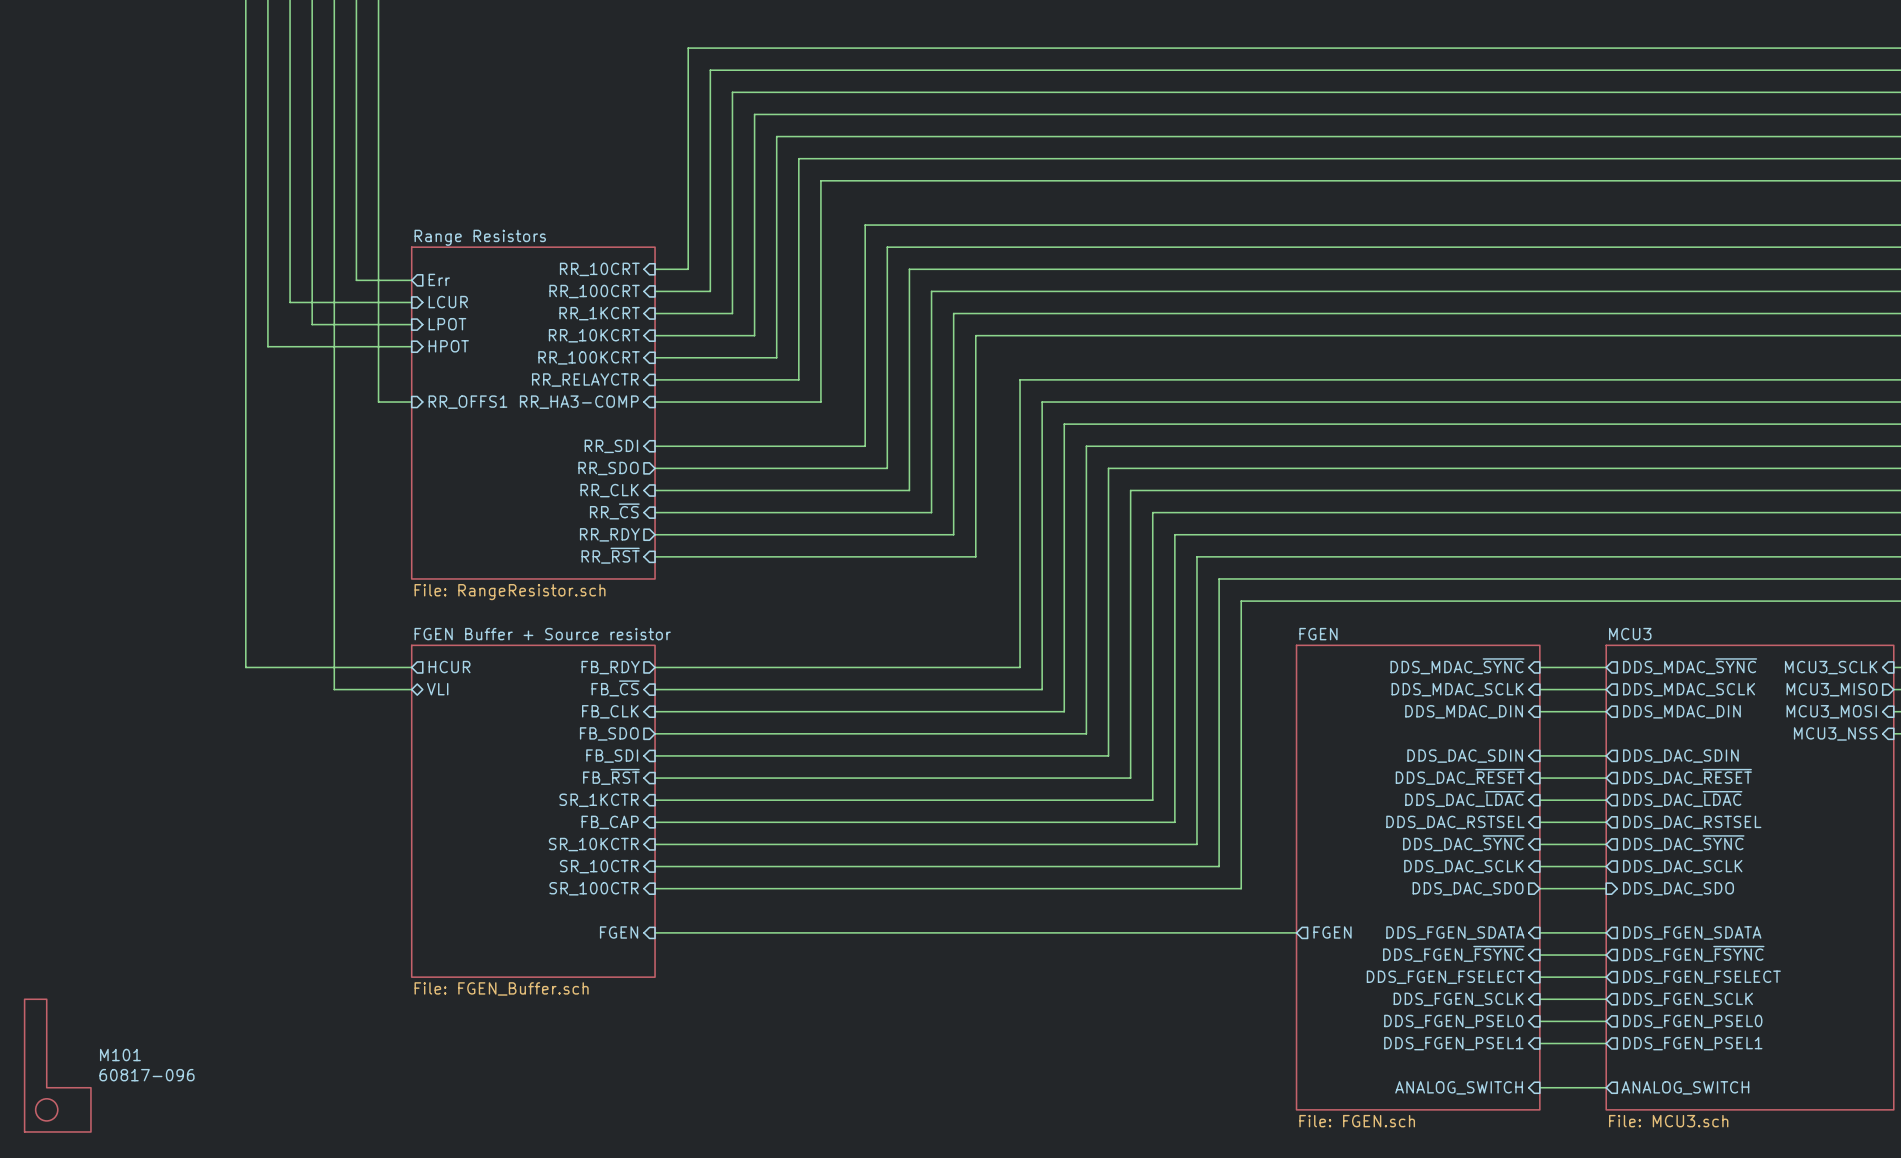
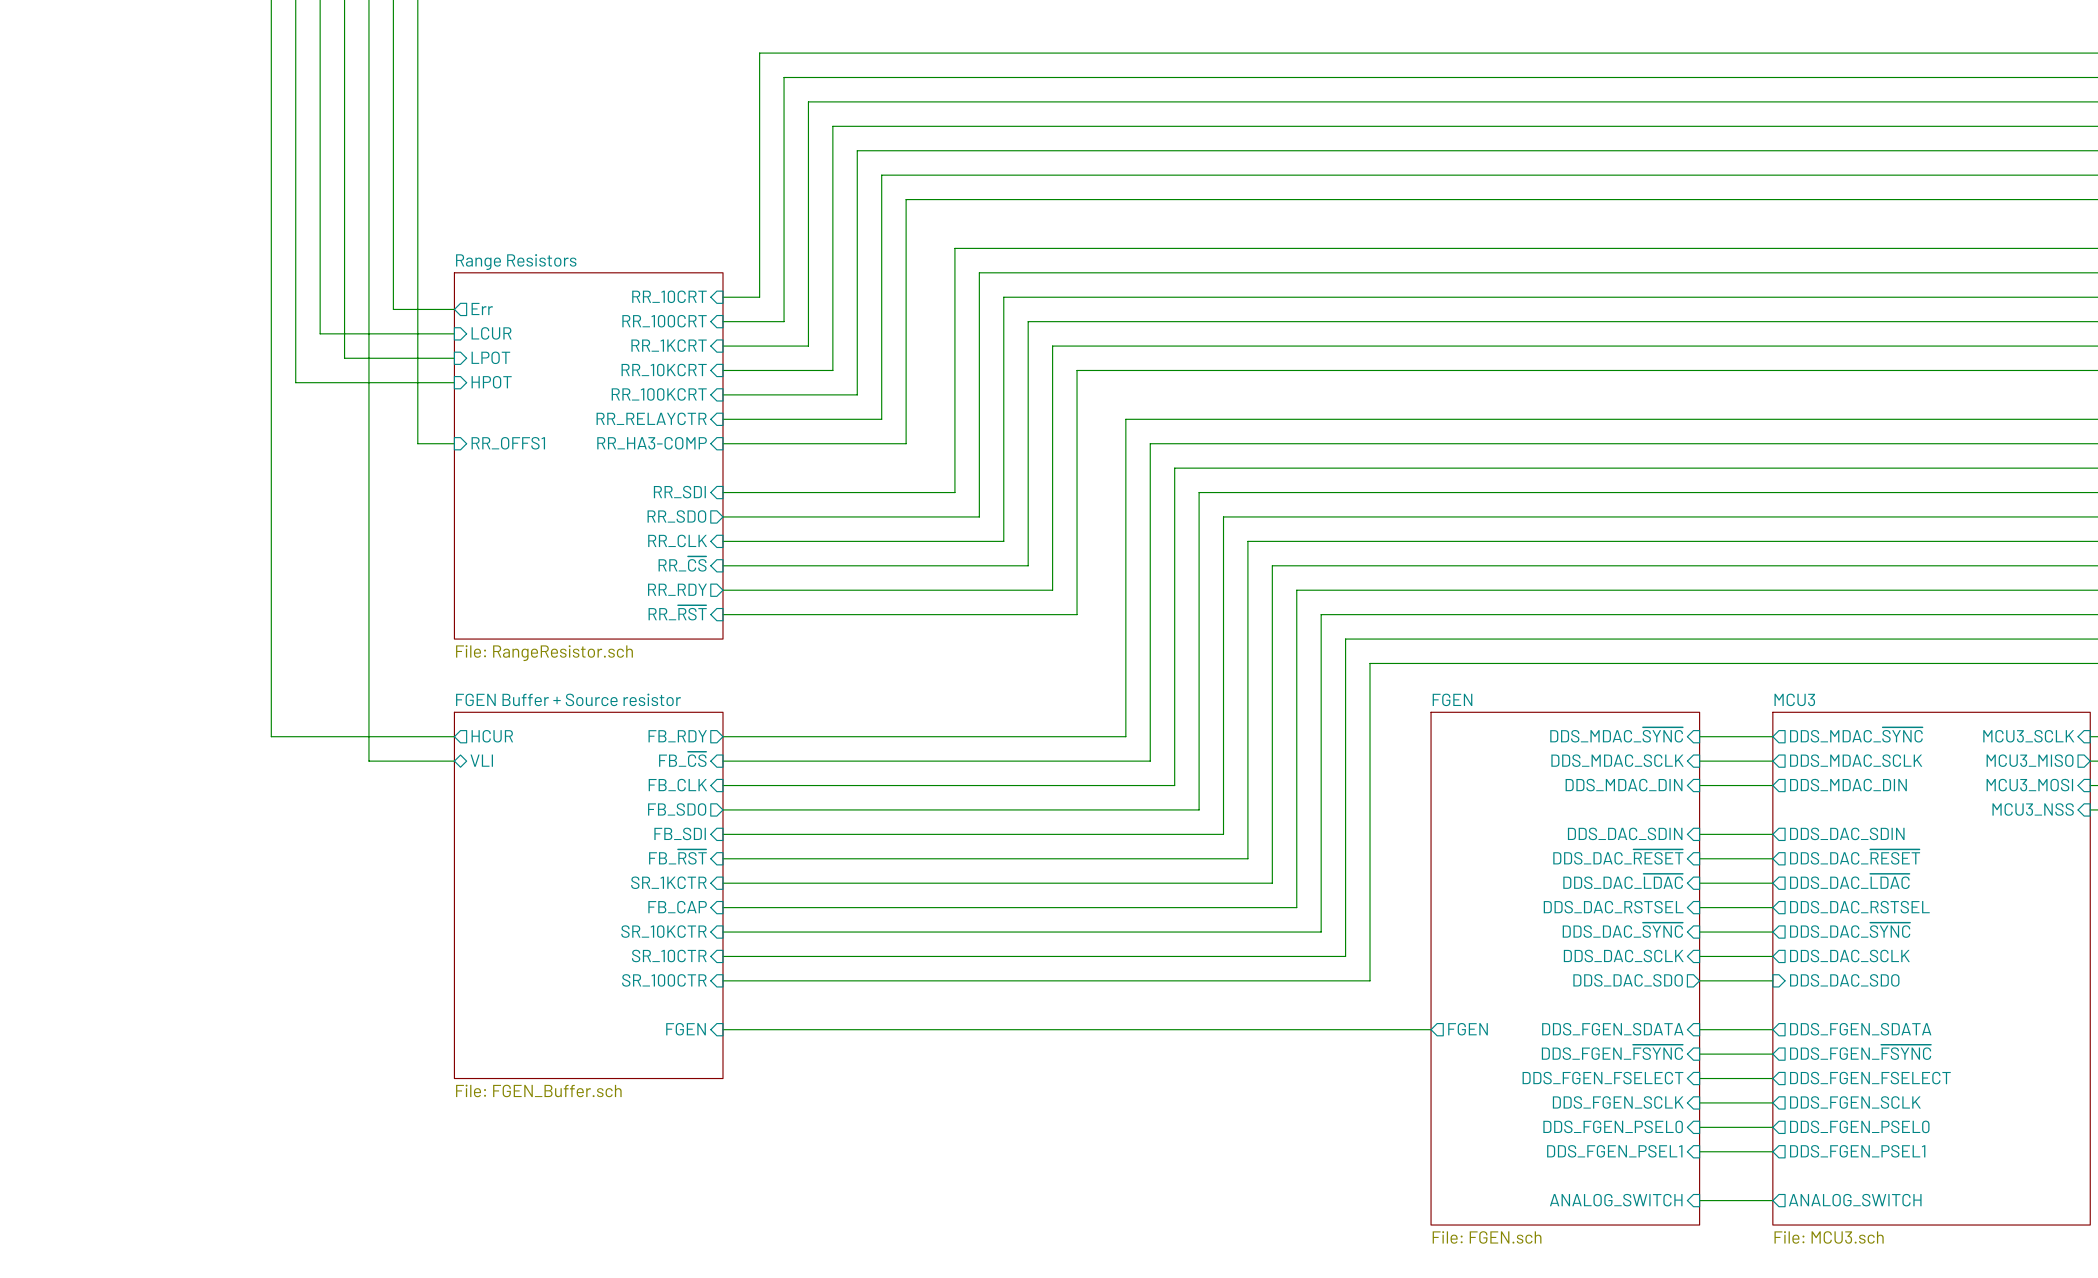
M101: 60817-096 (57, 1065) -> none

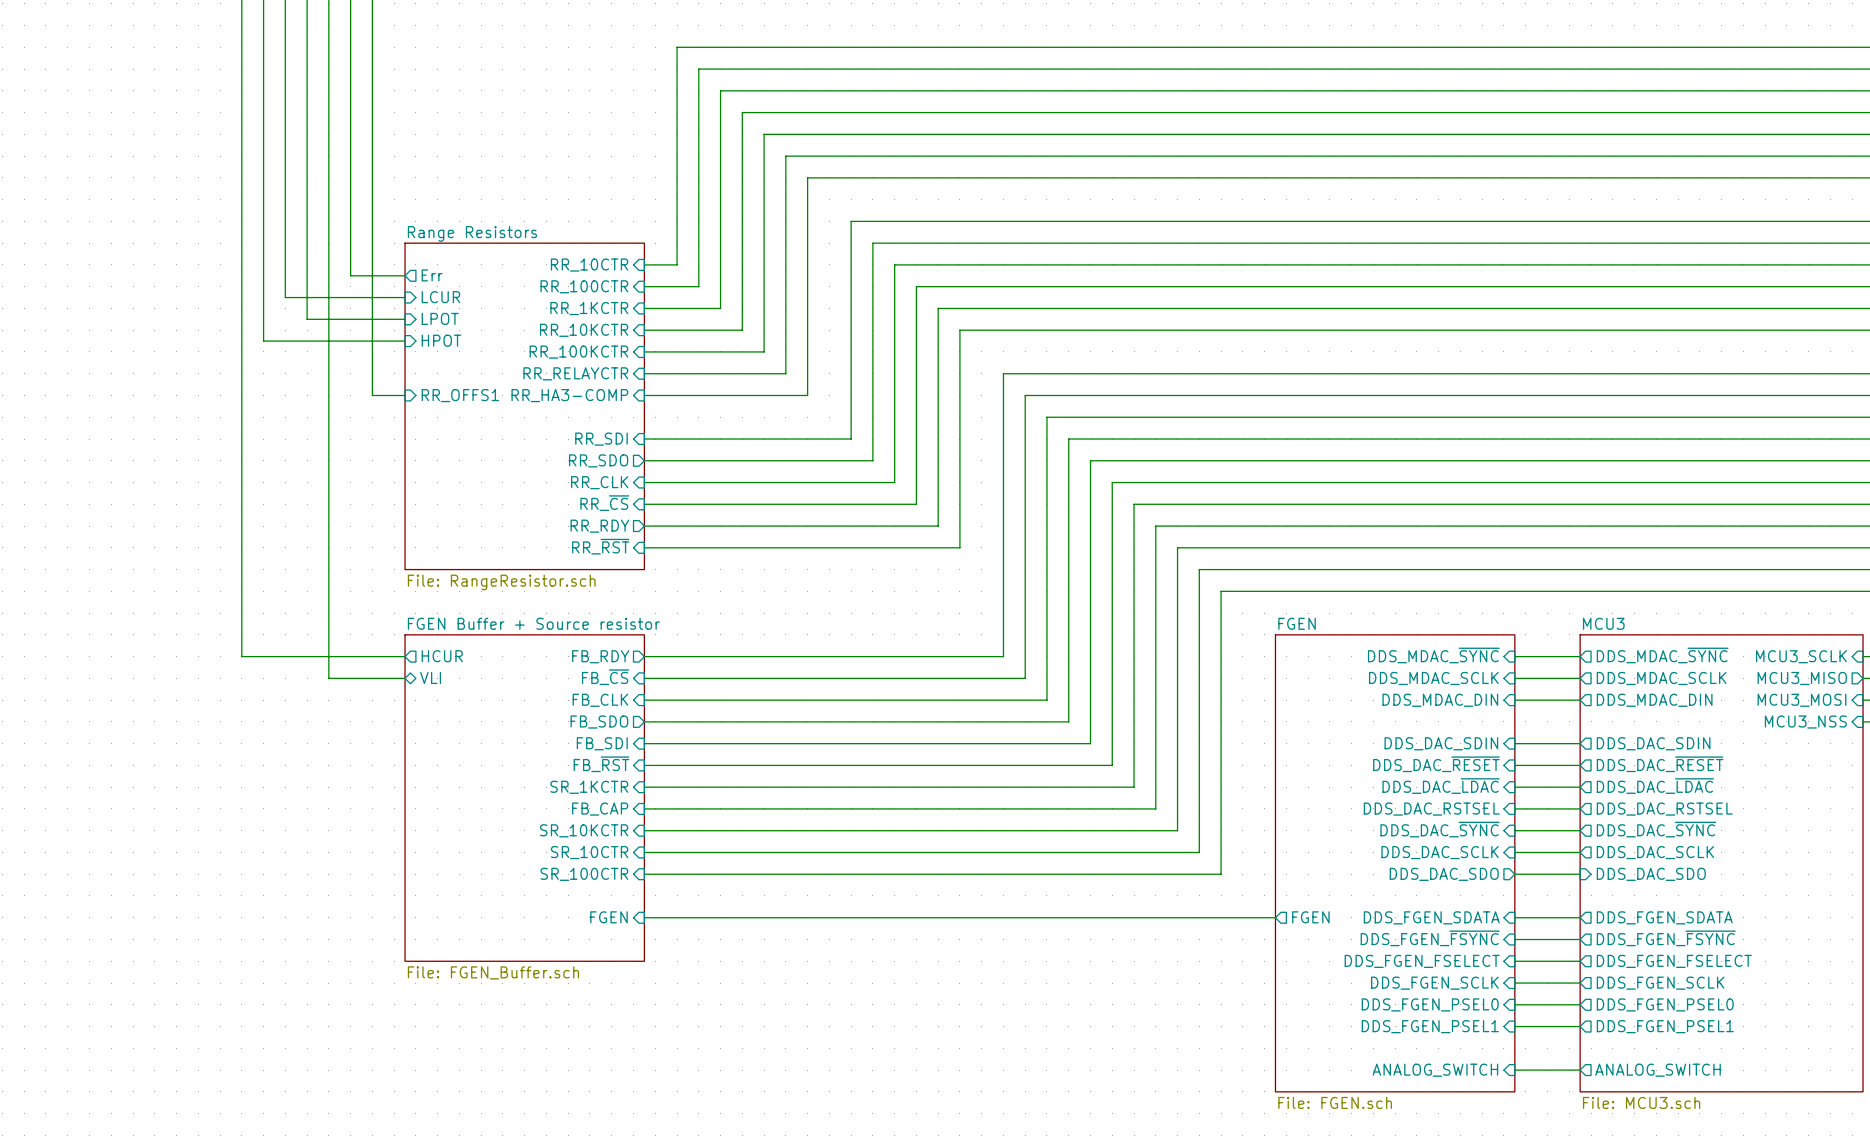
sheet pin: RR_10CRT (669, 296) -> RR_10CTR (589, 265)
sheet pin: RR_100CRT (664, 321) -> RR_100CTR (584, 286)
sheet pin: RR_1KCRT (669, 345) -> RR_1KCTR (589, 308)
sheet pin: RR_10KCRT (664, 370) -> RR_10KCTR (584, 330)
sheet pin: RR_100KCRT (659, 394) -> RR_100KCTR (578, 352)

